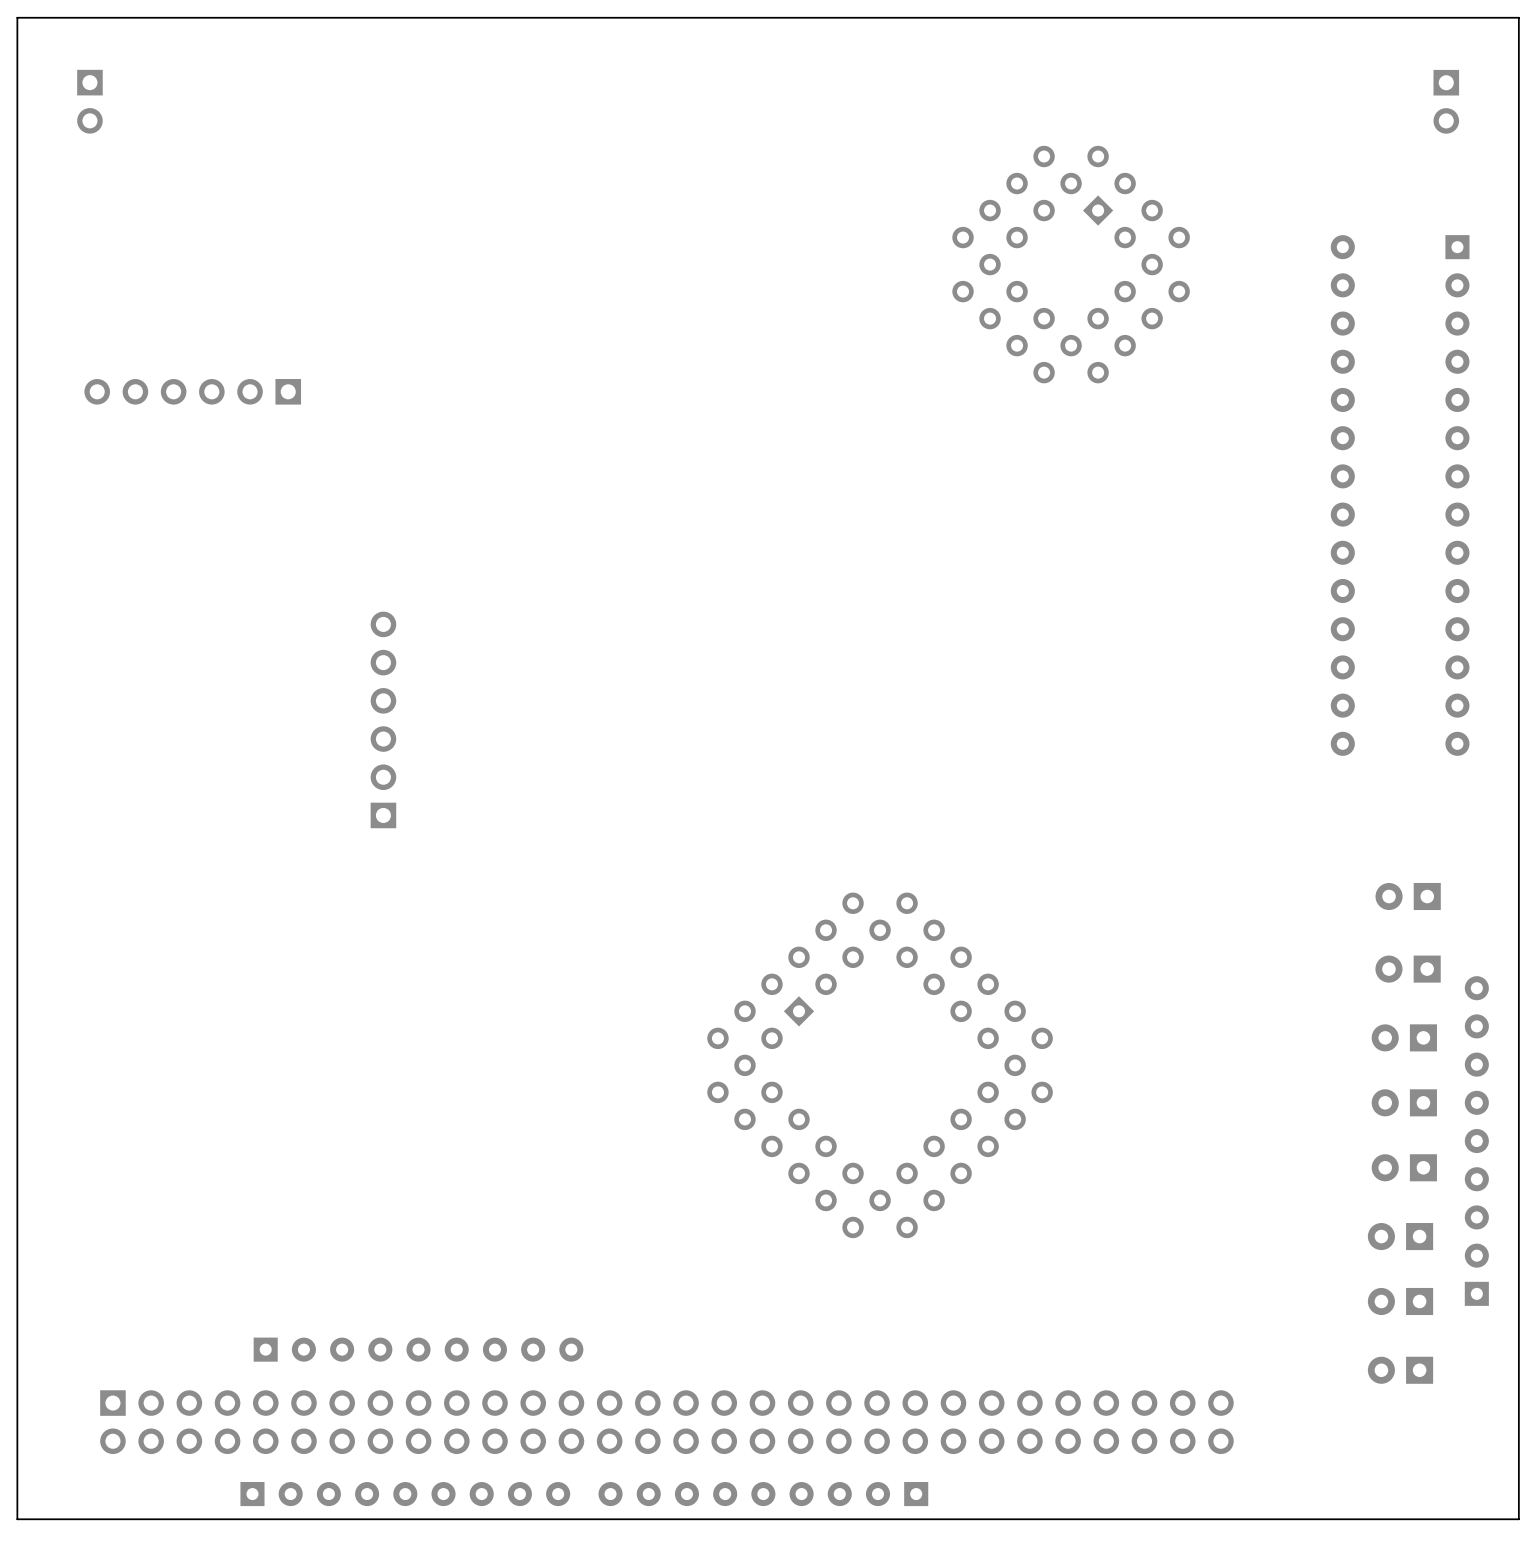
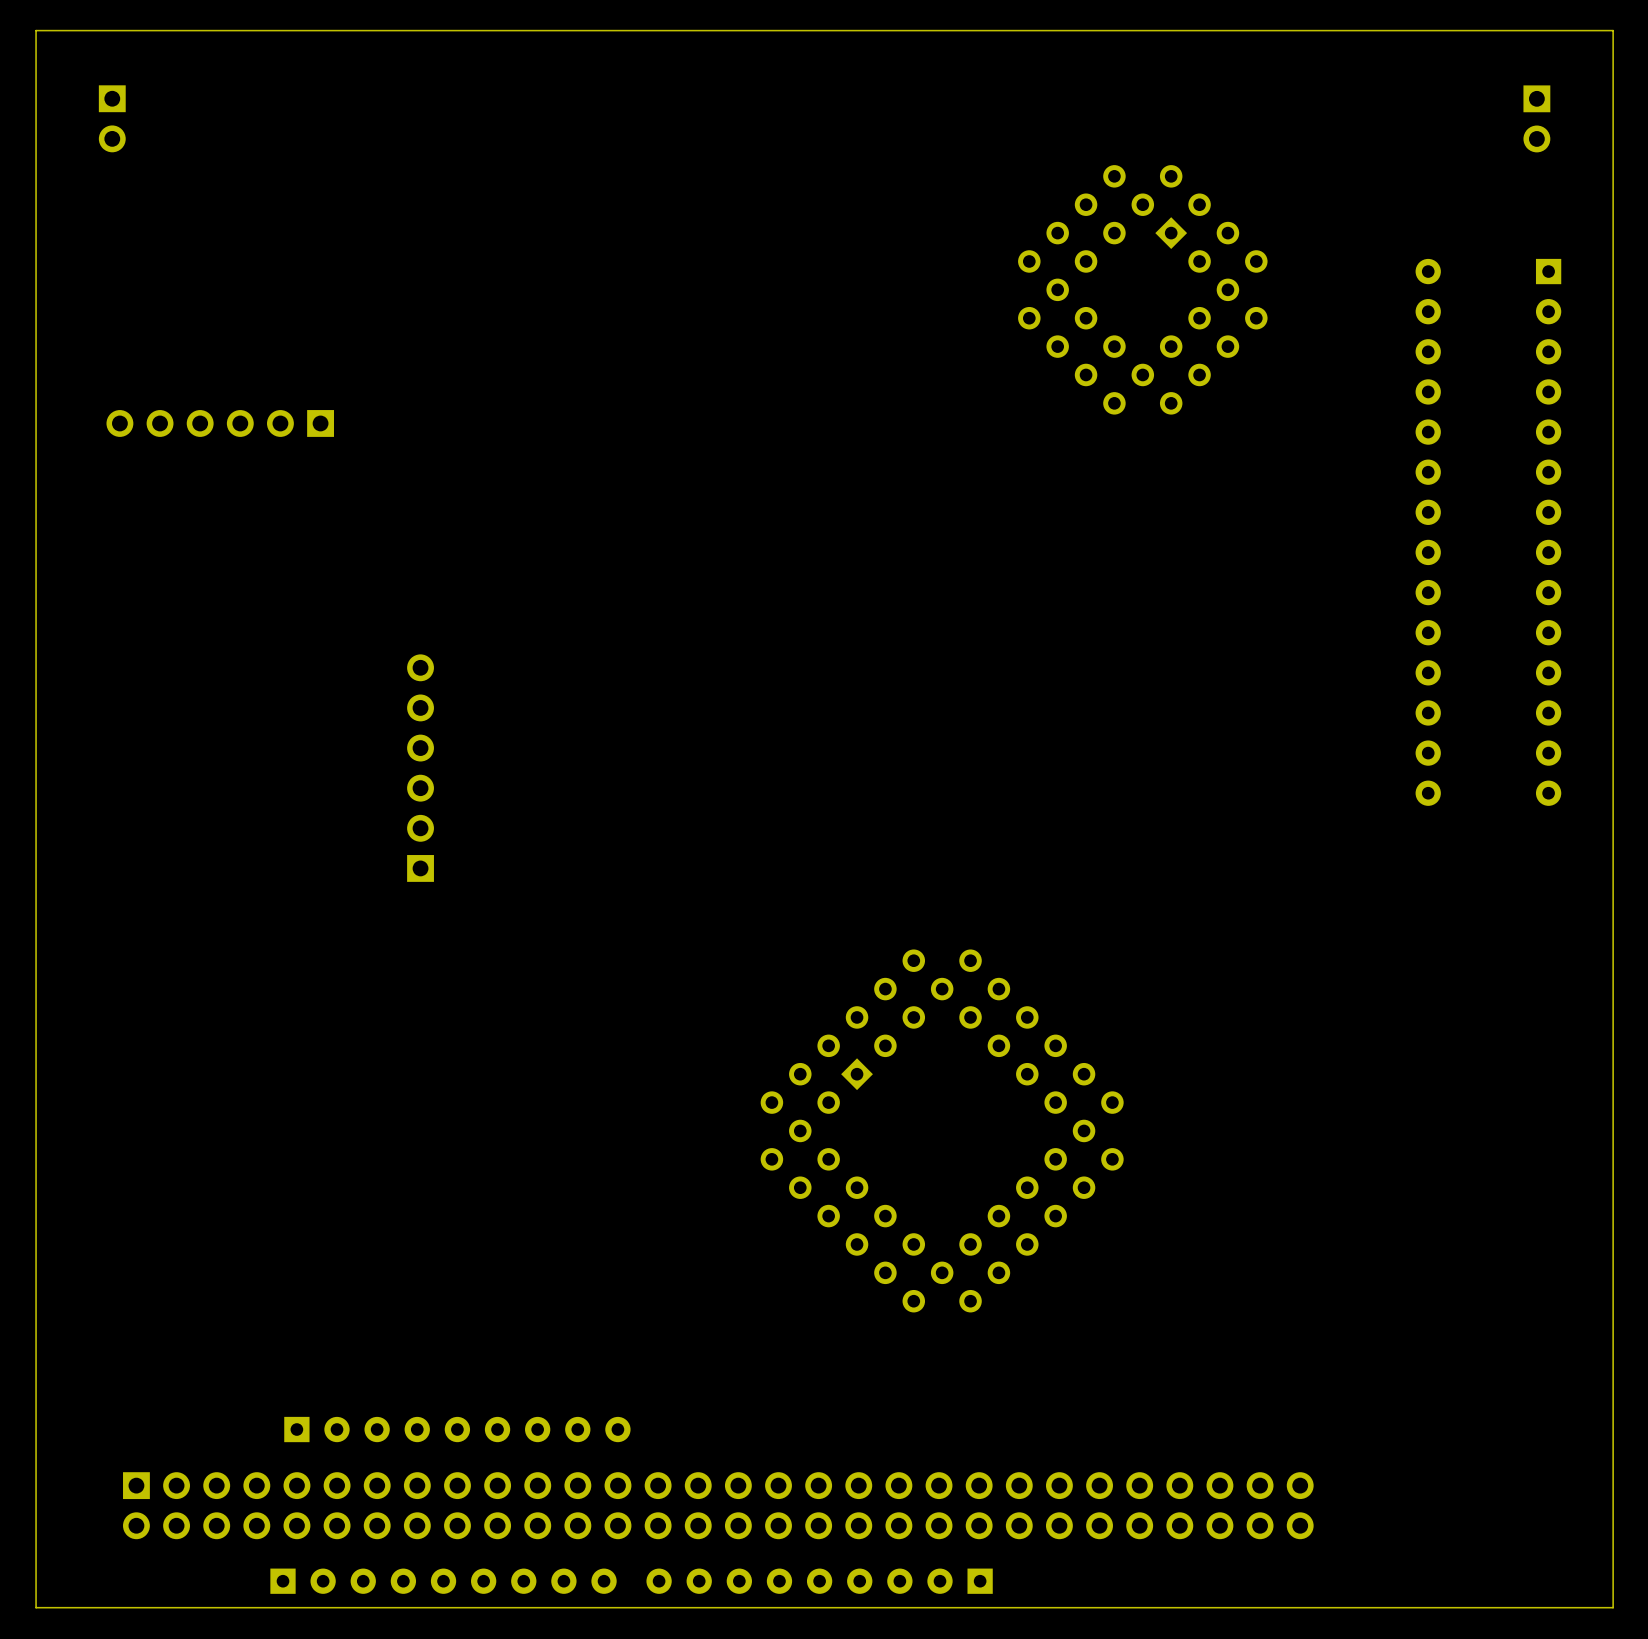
part: (1408, 896) -> none
part: (1408, 969) -> none
part: (1404, 1037) -> none
part: (1404, 1102) -> none
part: (1476, 1141) -> none
part: (1404, 1167) -> none
part: (1400, 1236) -> none
part: (1400, 1301) -> none
part: (1400, 1370) -> none

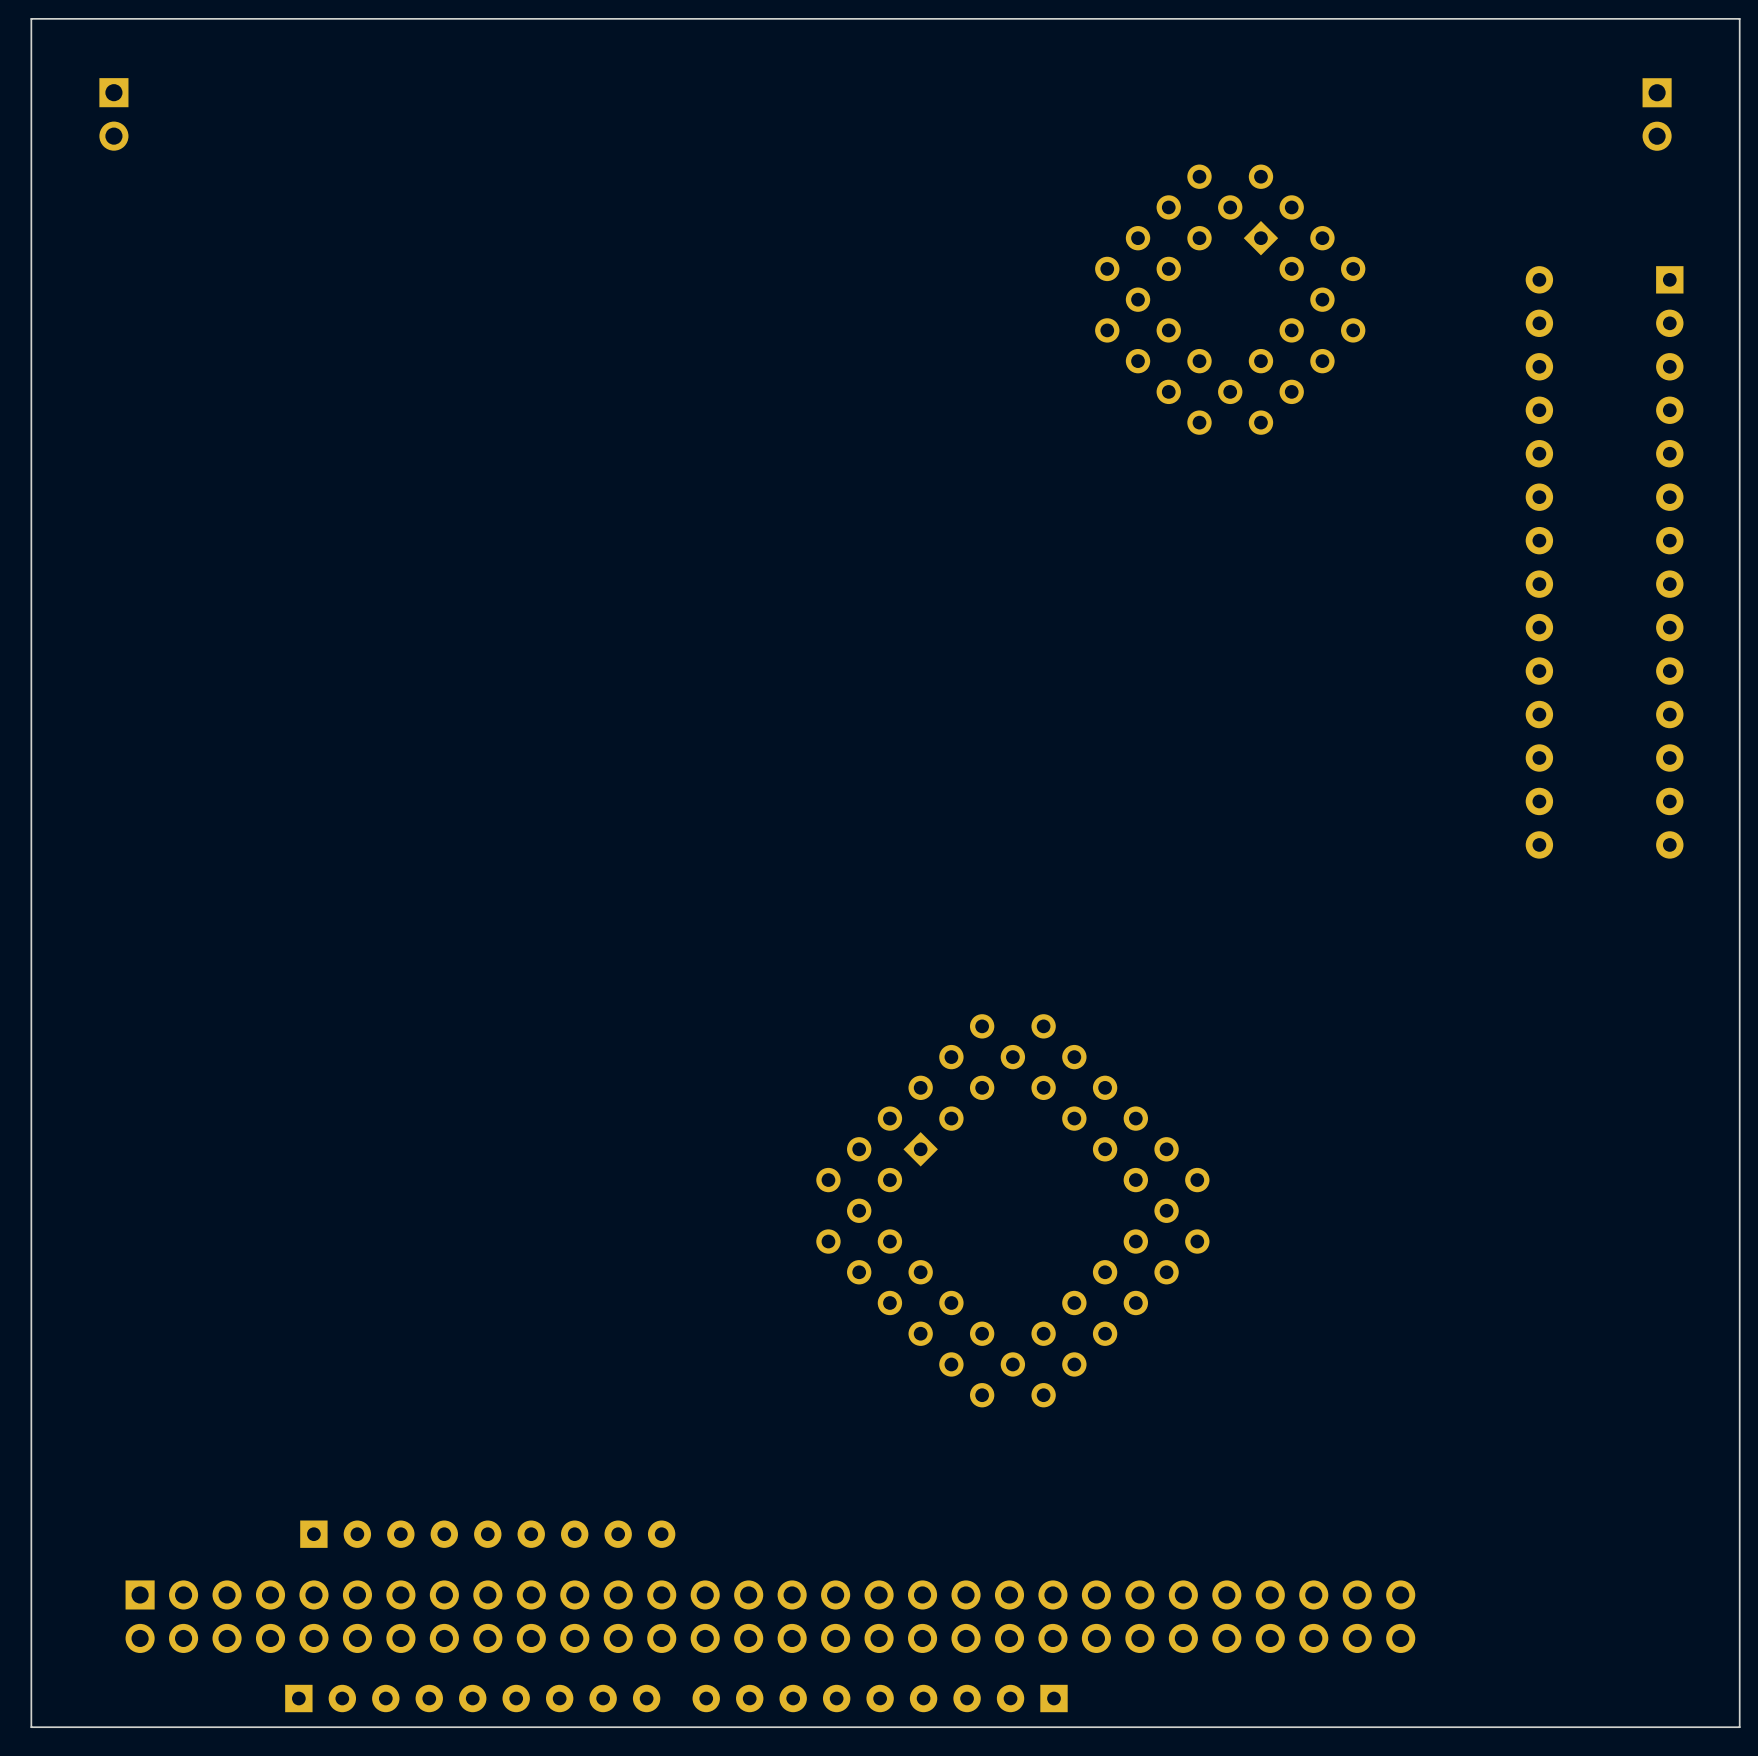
part: (220, 423) -> none
part: (420, 768) -> none

